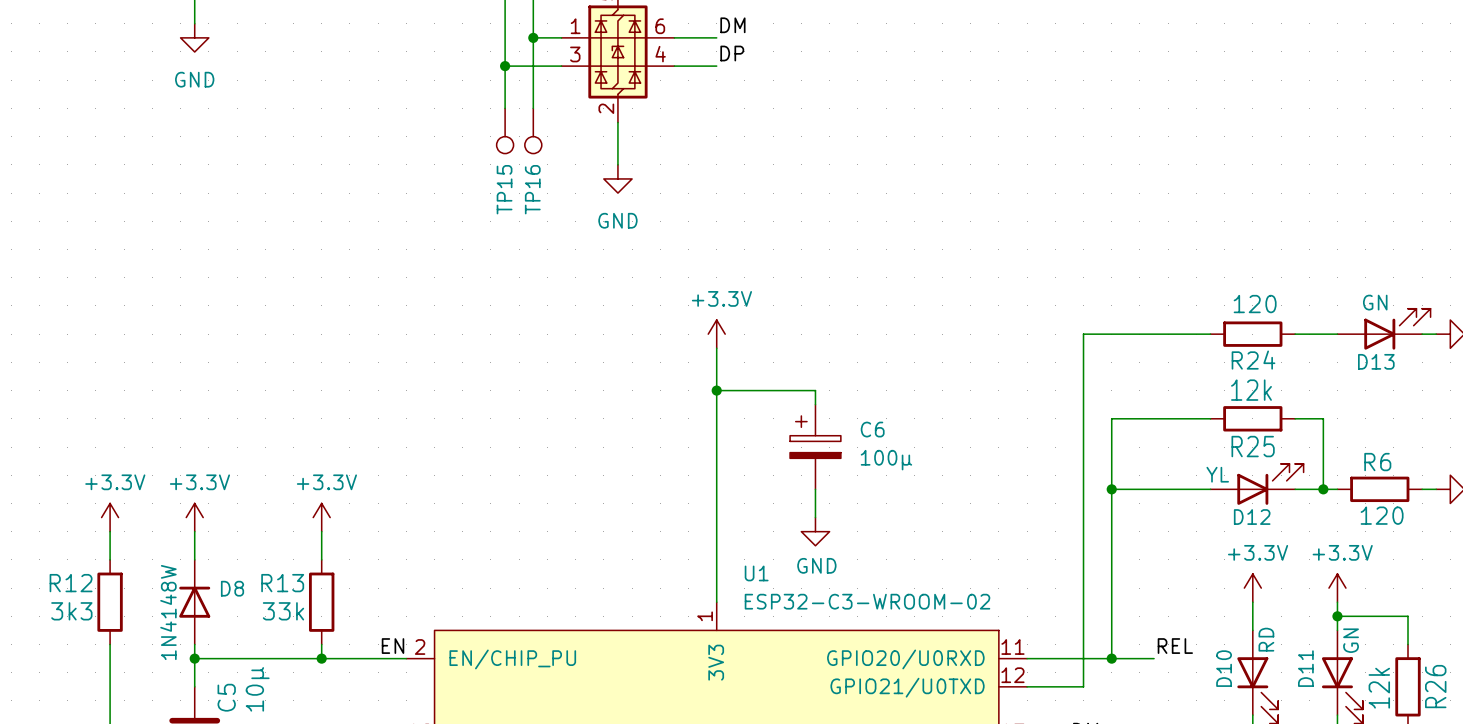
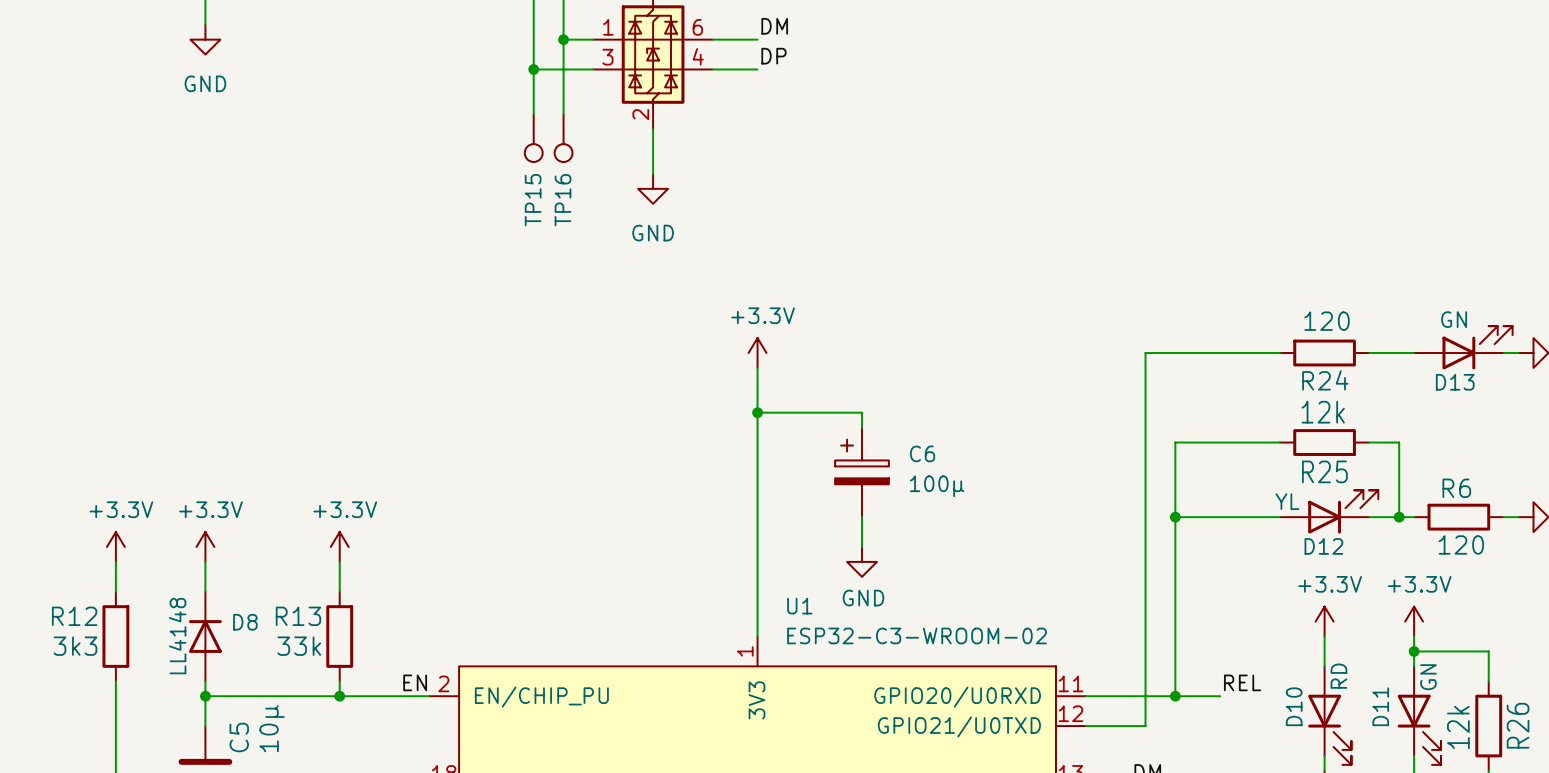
D8 value: 1N4148W (168, 612) -> LL4148 (177, 636)

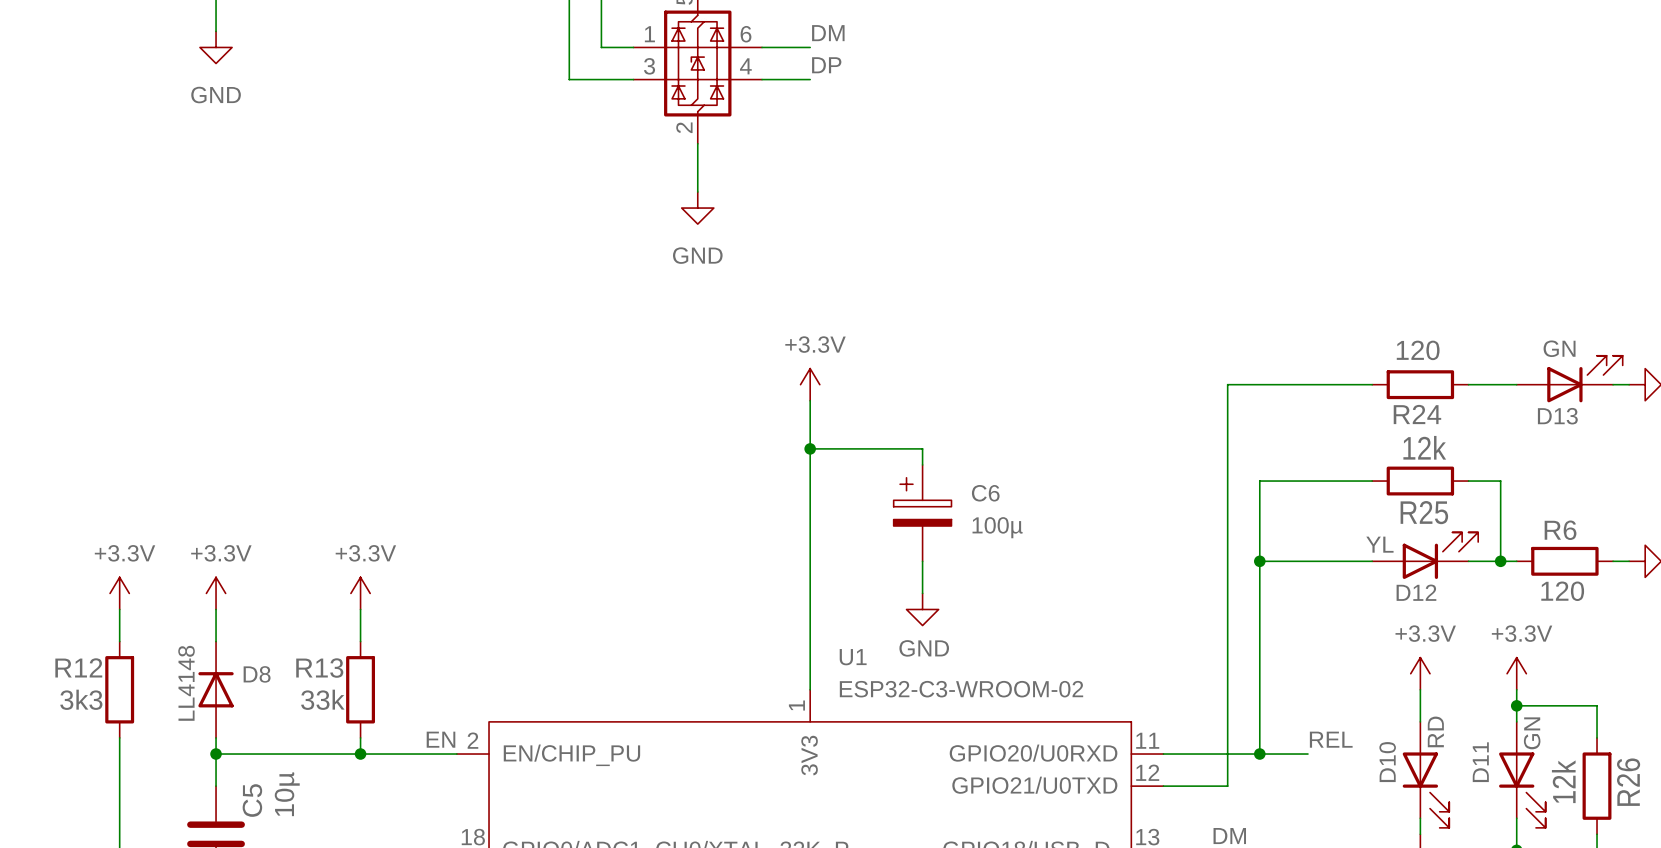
wire: (563, 39) (563, 114) -> none
junction: (563, 39) -> none
wire: (533, 69) (533, 114) -> none
junction: (533, 69) -> none
TP15: (533, 138) -> none
TP16: (563, 138) -> none

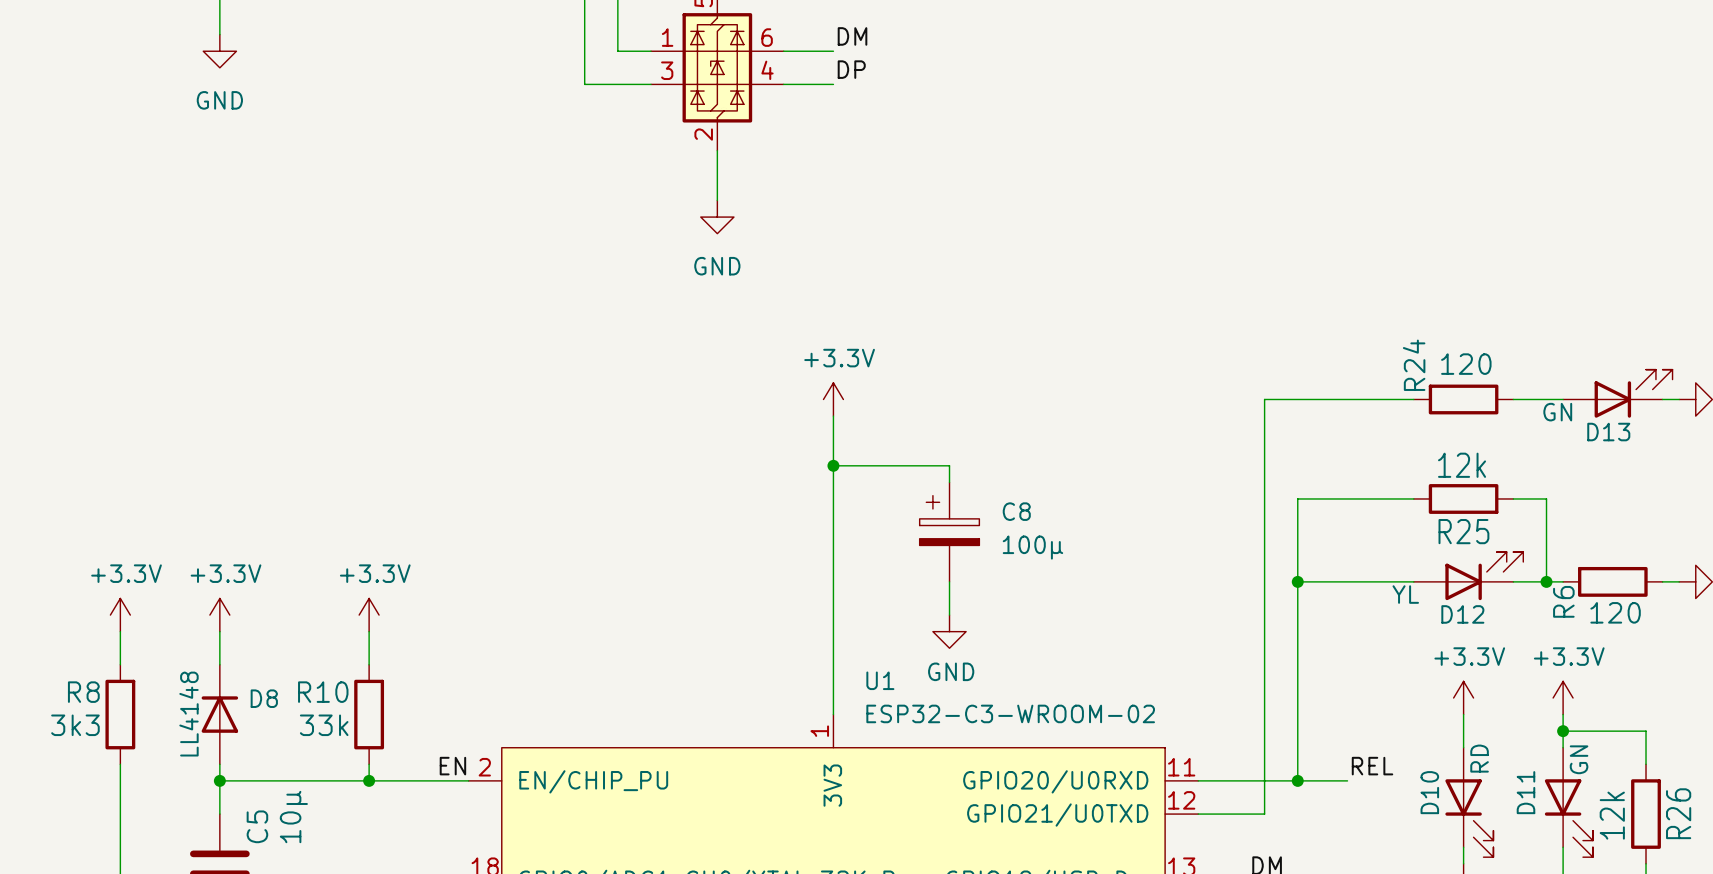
D13 value position: GN (1559, 348) -> GN (1557, 412)
R24 name rotation: 0° (1417, 414) -> 90° counterclockwise (1414, 365)
R24 name position: R24 (1417, 414) -> R24 (1414, 365)
C6 name: C6 (985, 493) -> C8 (1016, 511)
R6 name rotation: 0° (1560, 530) -> 90° counterclockwise (1563, 601)
R6 name position: R6 (1560, 530) -> R6 (1563, 601)
D12 value position: YL (1379, 544) -> YL (1405, 594)
R12 name: R12 (78, 667) -> R8 (83, 692)
R13 name: R13 (319, 668) -> R10 (323, 692)

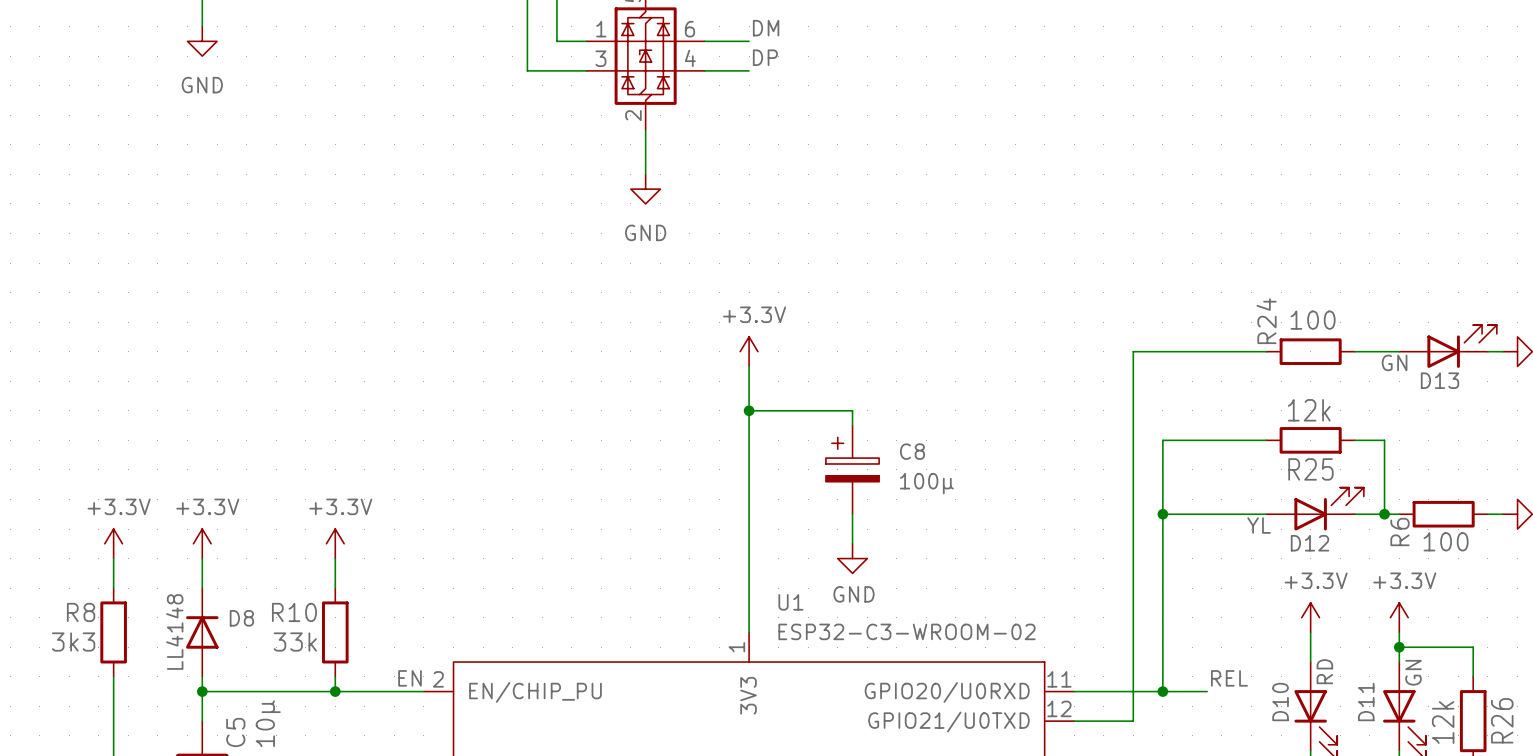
R24 value: 120 (1466, 364) -> 100 (1313, 320)
R6 value: 120 (1615, 612) -> 100 (1446, 541)

